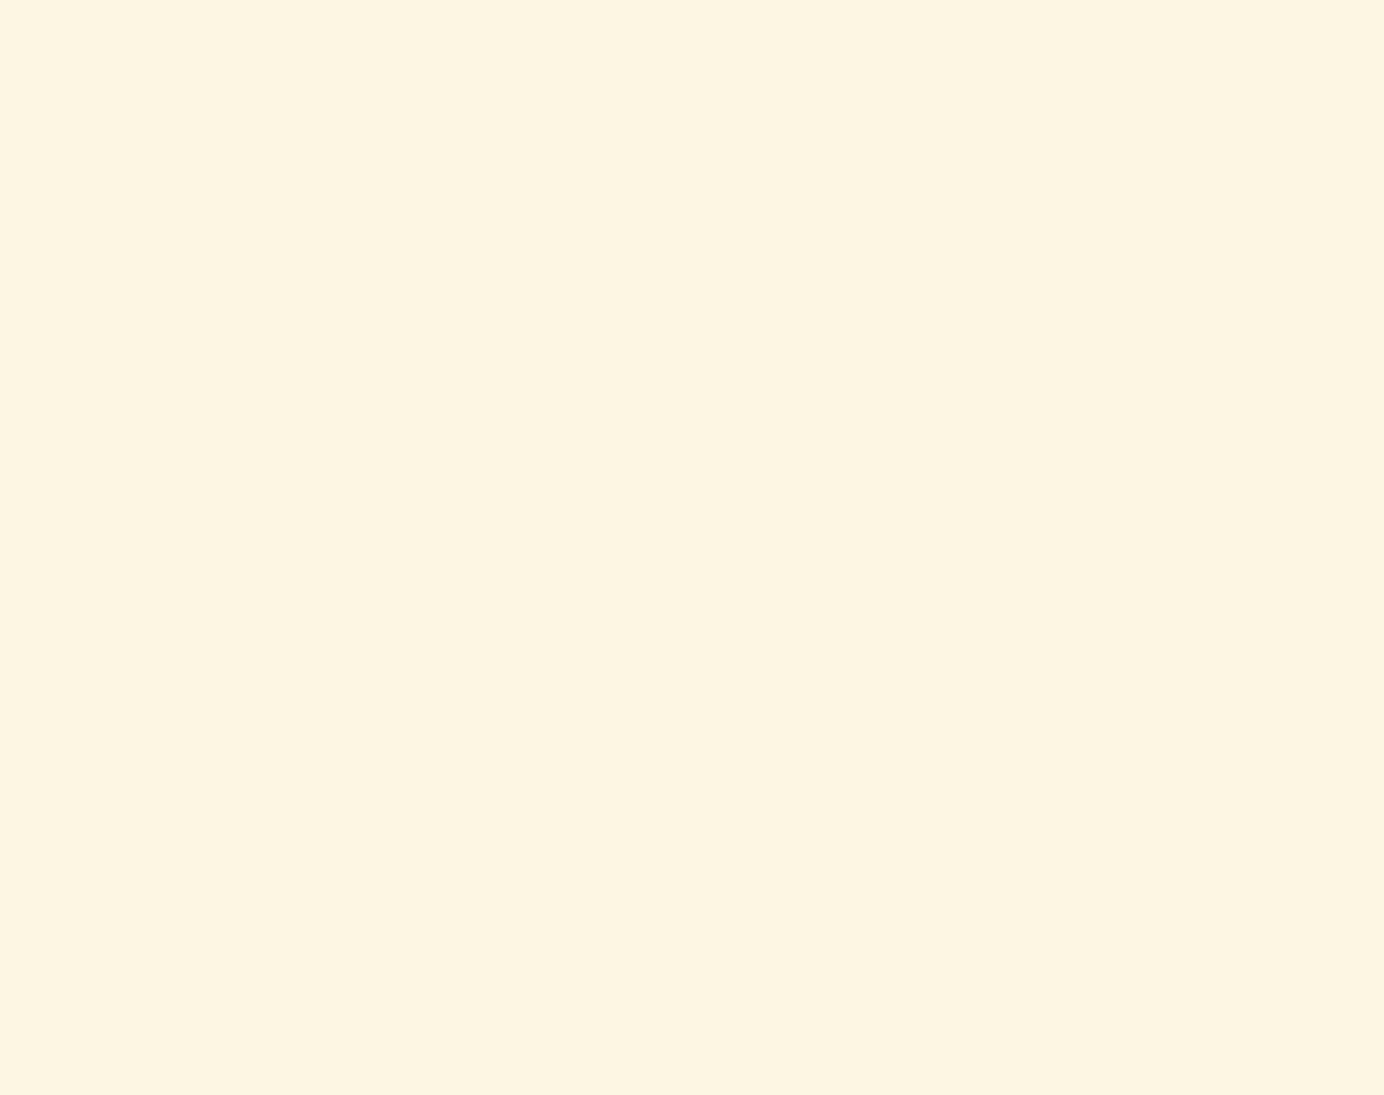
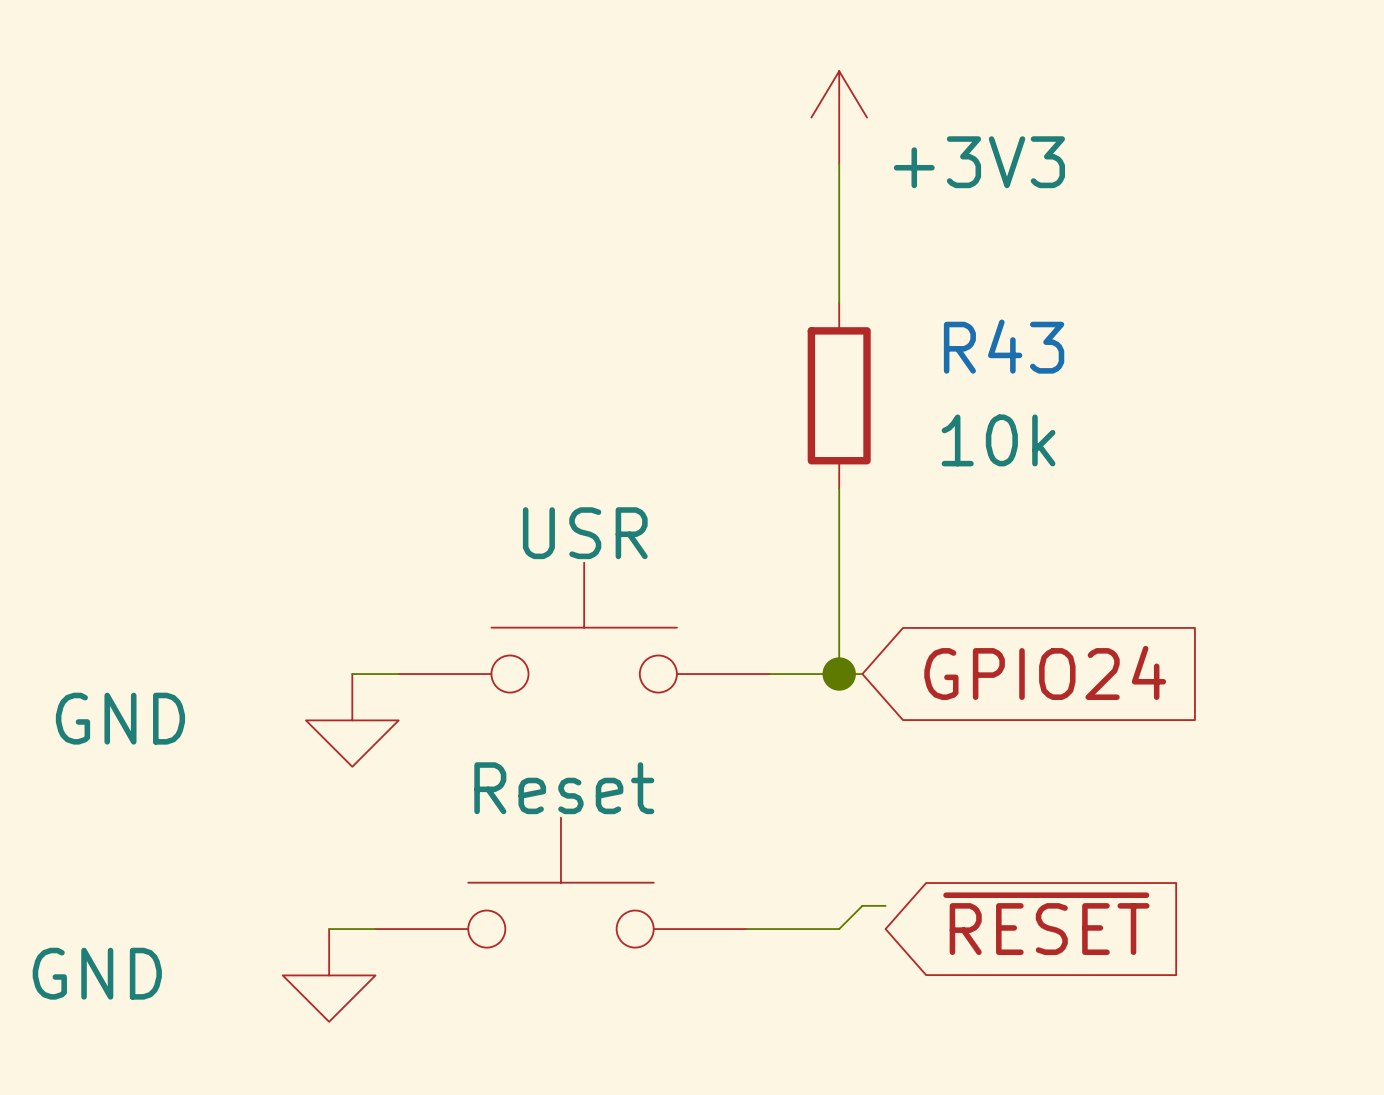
power symbol: none -> +3V3 (839, 117)
wire: none -> (839, 163) (839, 303)
R43: none -> 10k (839, 395)
wire: none -> (839, 488) (839, 674)
part: none -> USR (584, 627)
wire: none -> (352, 674) (398, 674)
wire: none -> (769, 674) (862, 674)
junction: none -> (839, 674)
global label: none -> GPIO24 (1045, 672)
power symbol: none -> GND (352, 720)
part: none -> Reset (560, 882)
wire: none -> (885, 905) (862, 905) (839, 929) (746, 929)
global label: none -> ~{RESET} (1046, 923)
wire: none -> (329, 929) (375, 929)
power symbol: none -> GND (329, 975)

